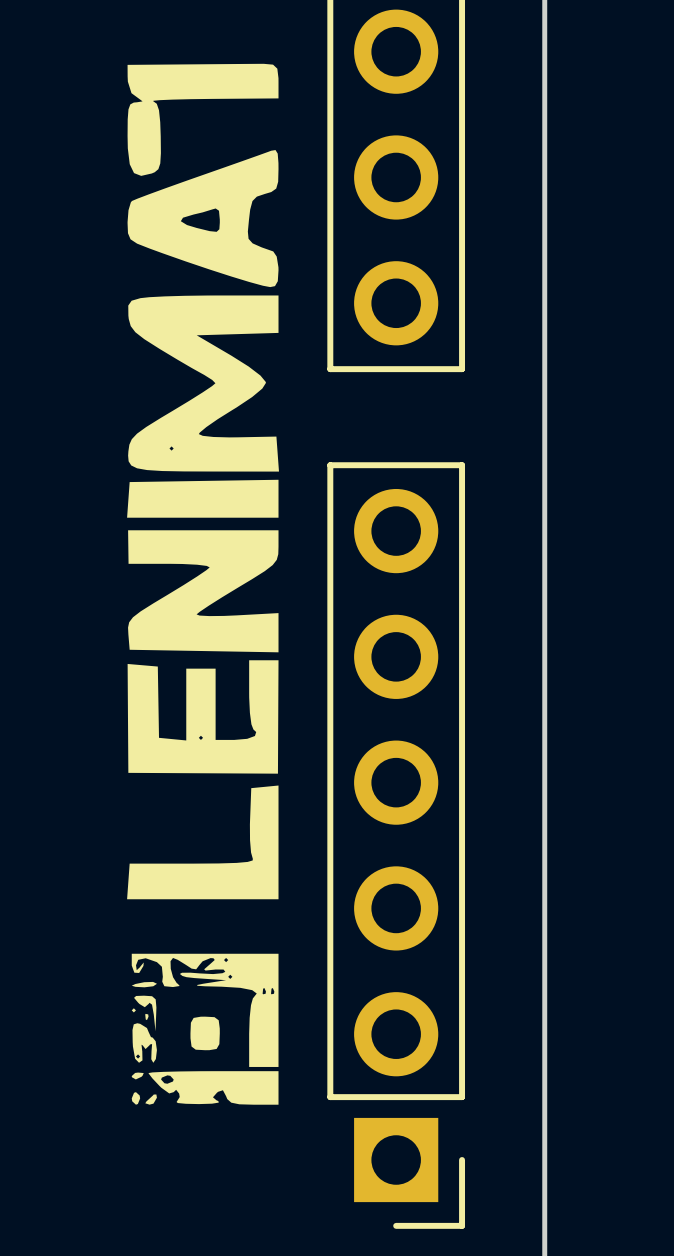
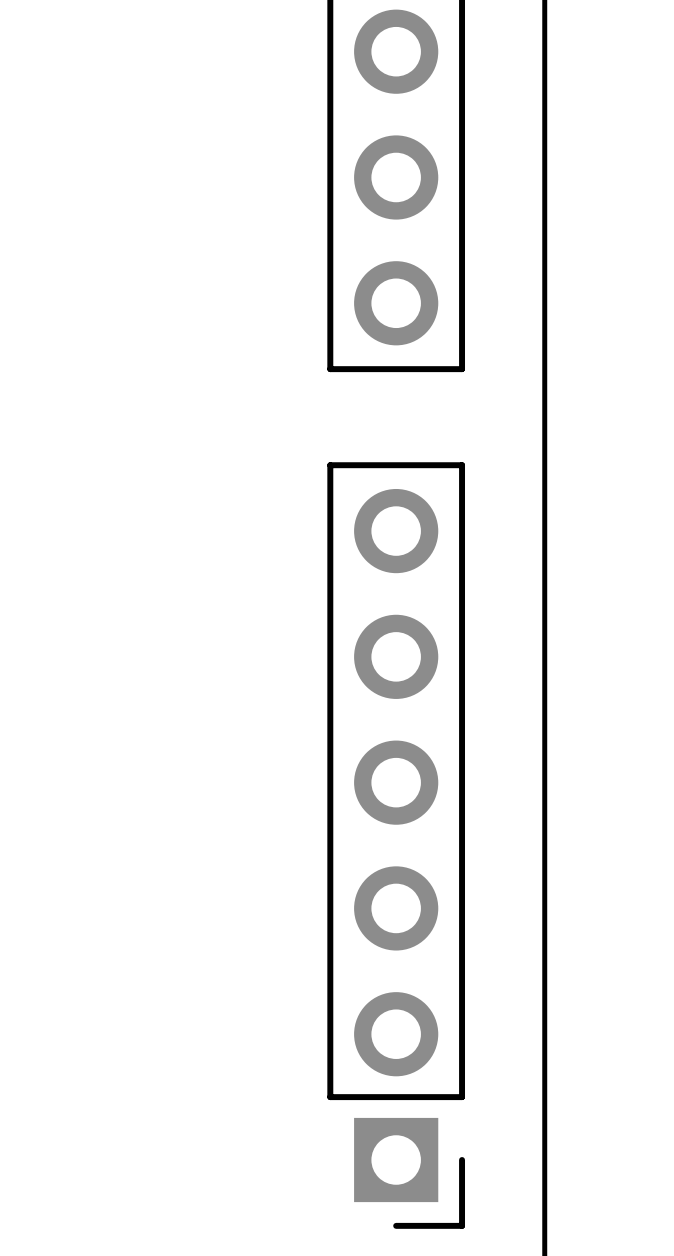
drawing: [127, 63, 279, 1105] -> none

